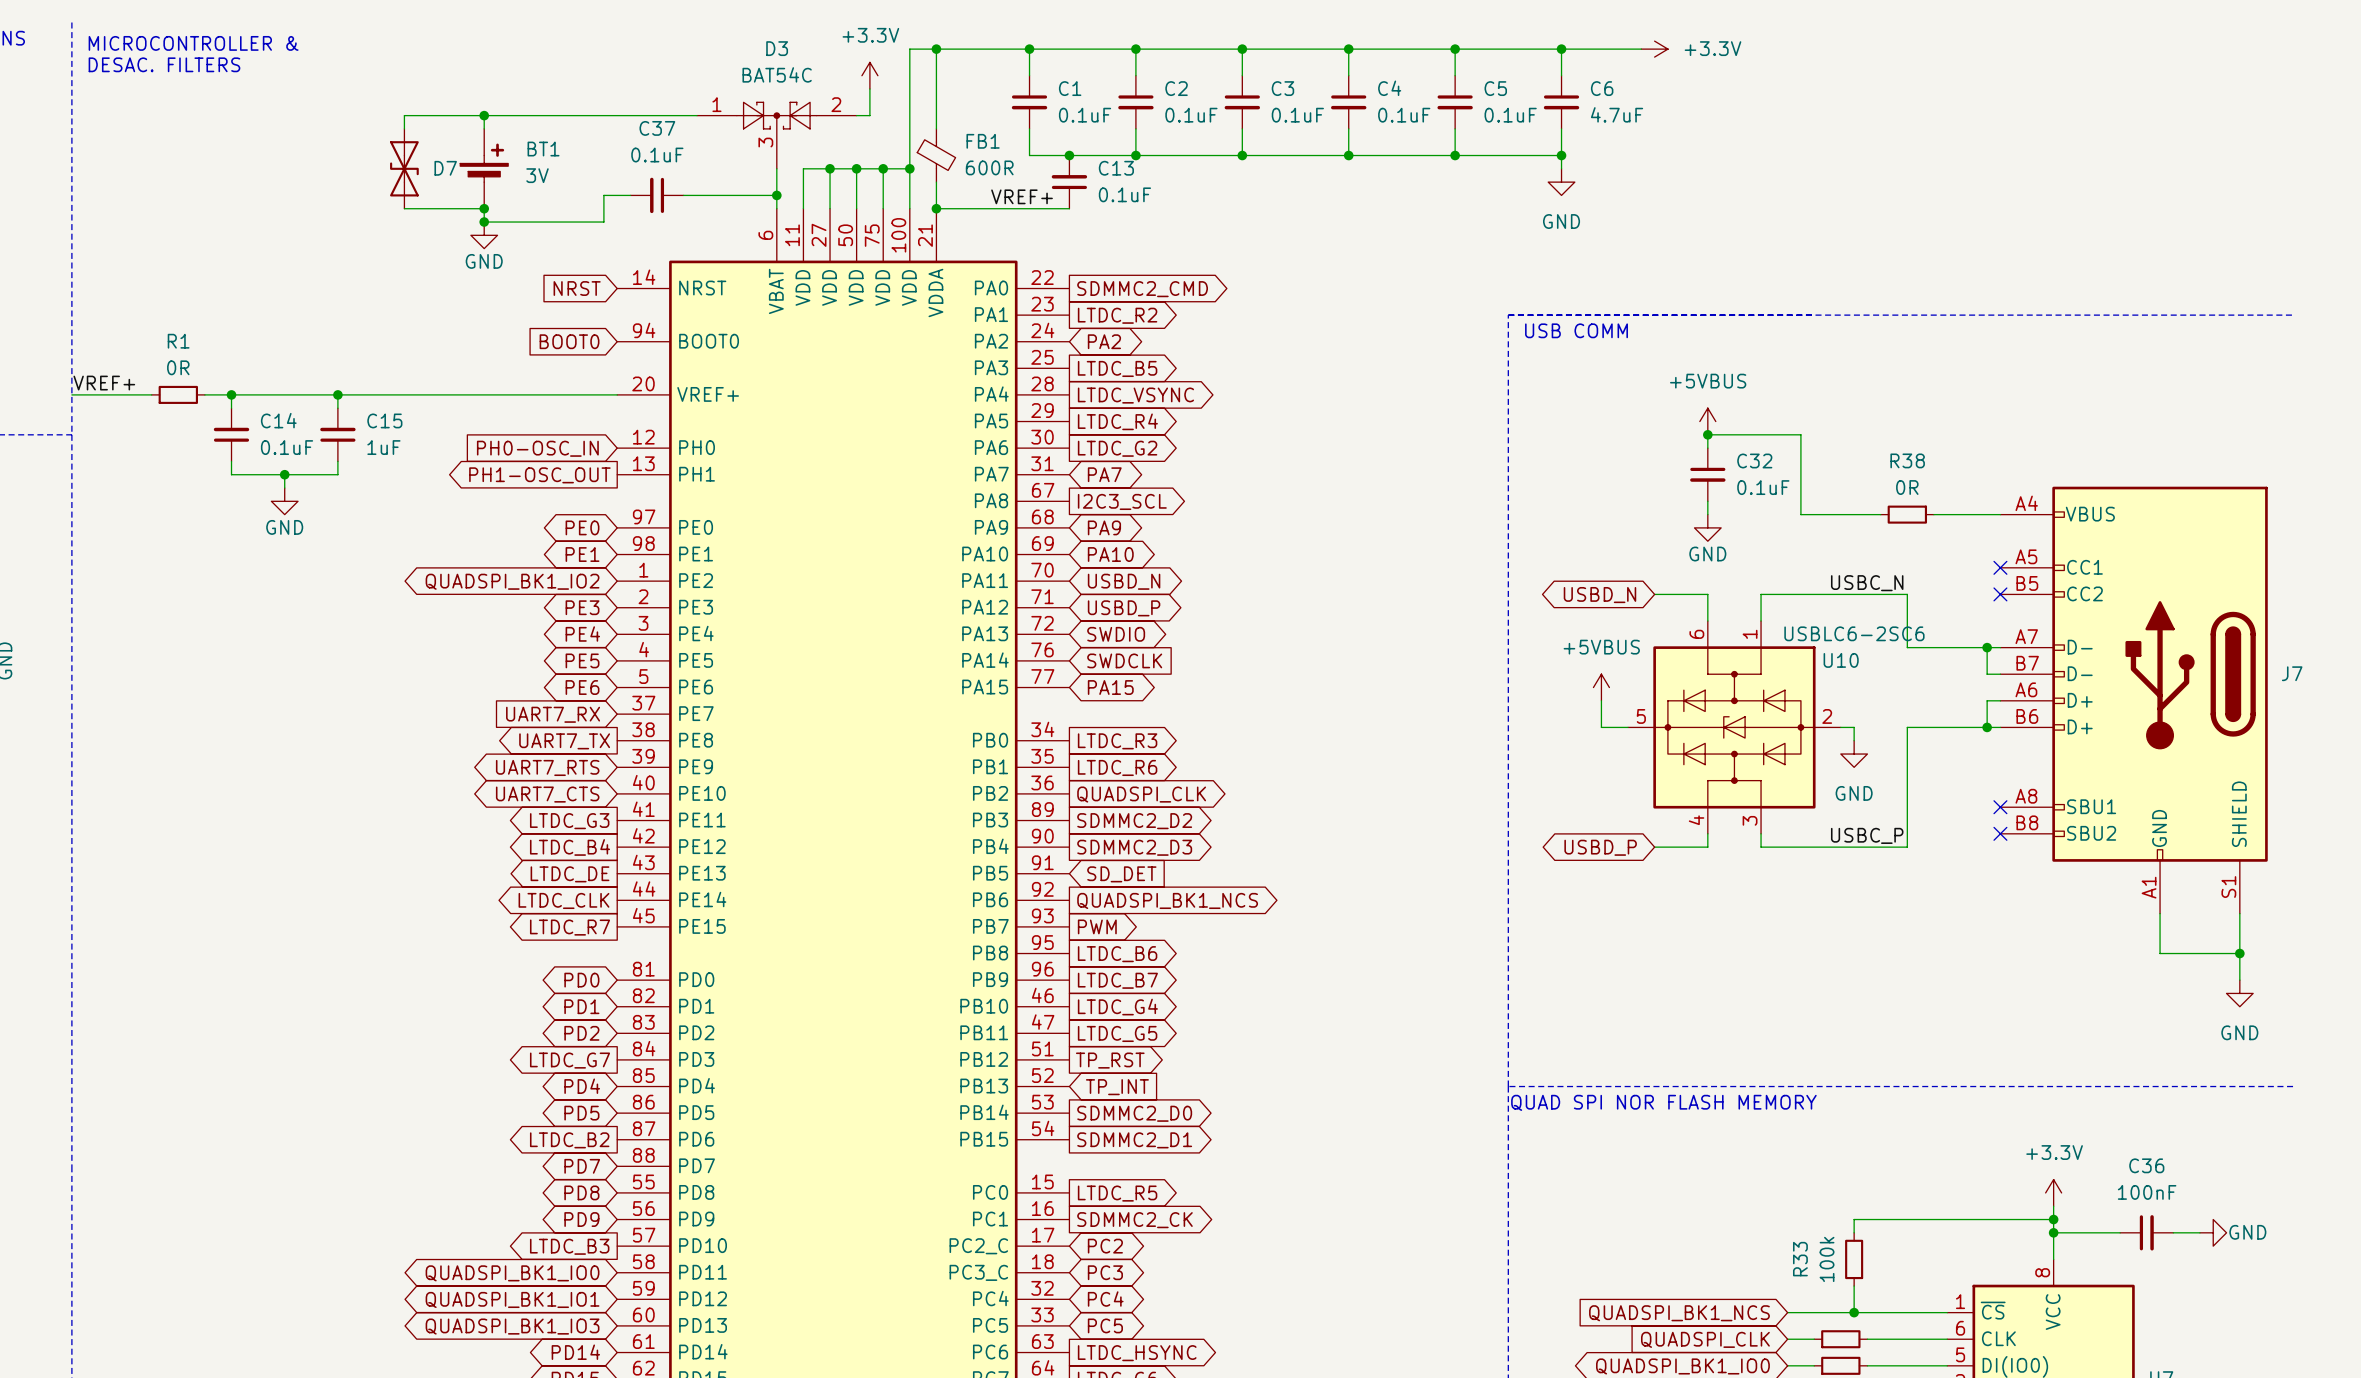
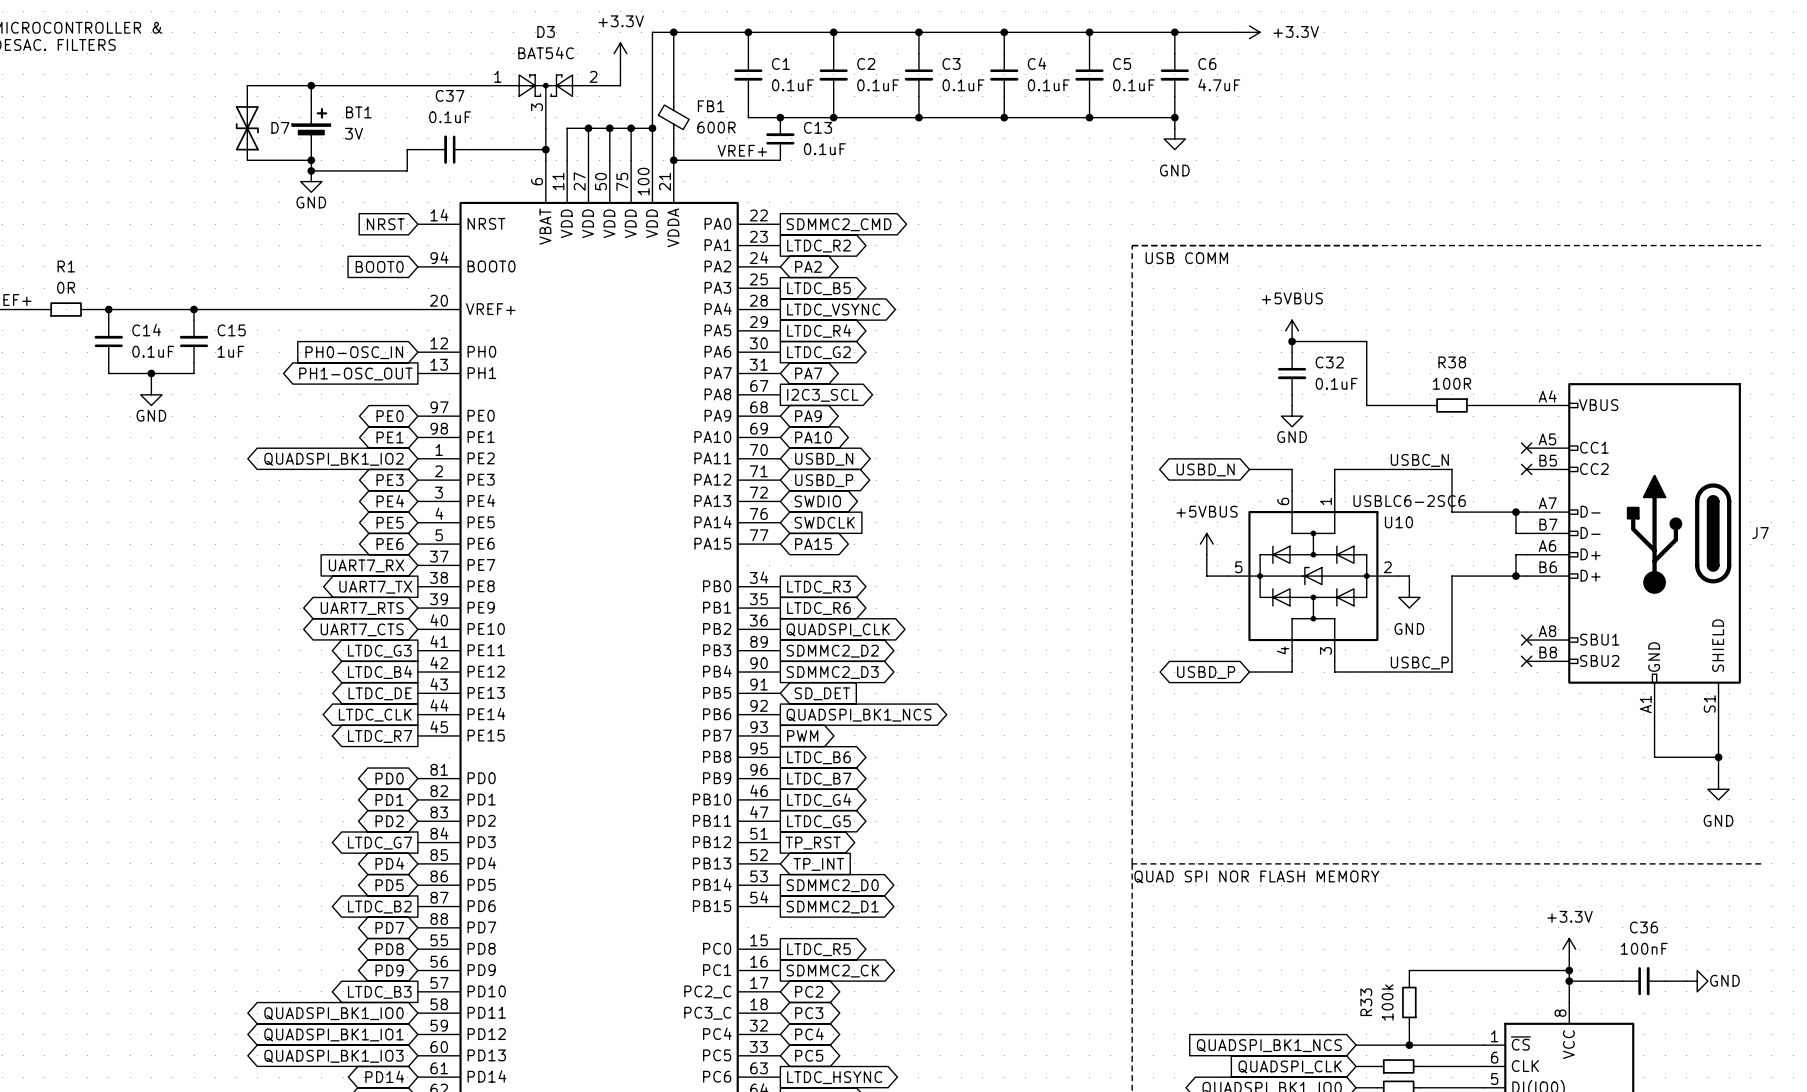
R38 value: 0R (1907, 487) -> 100R (1452, 383)

